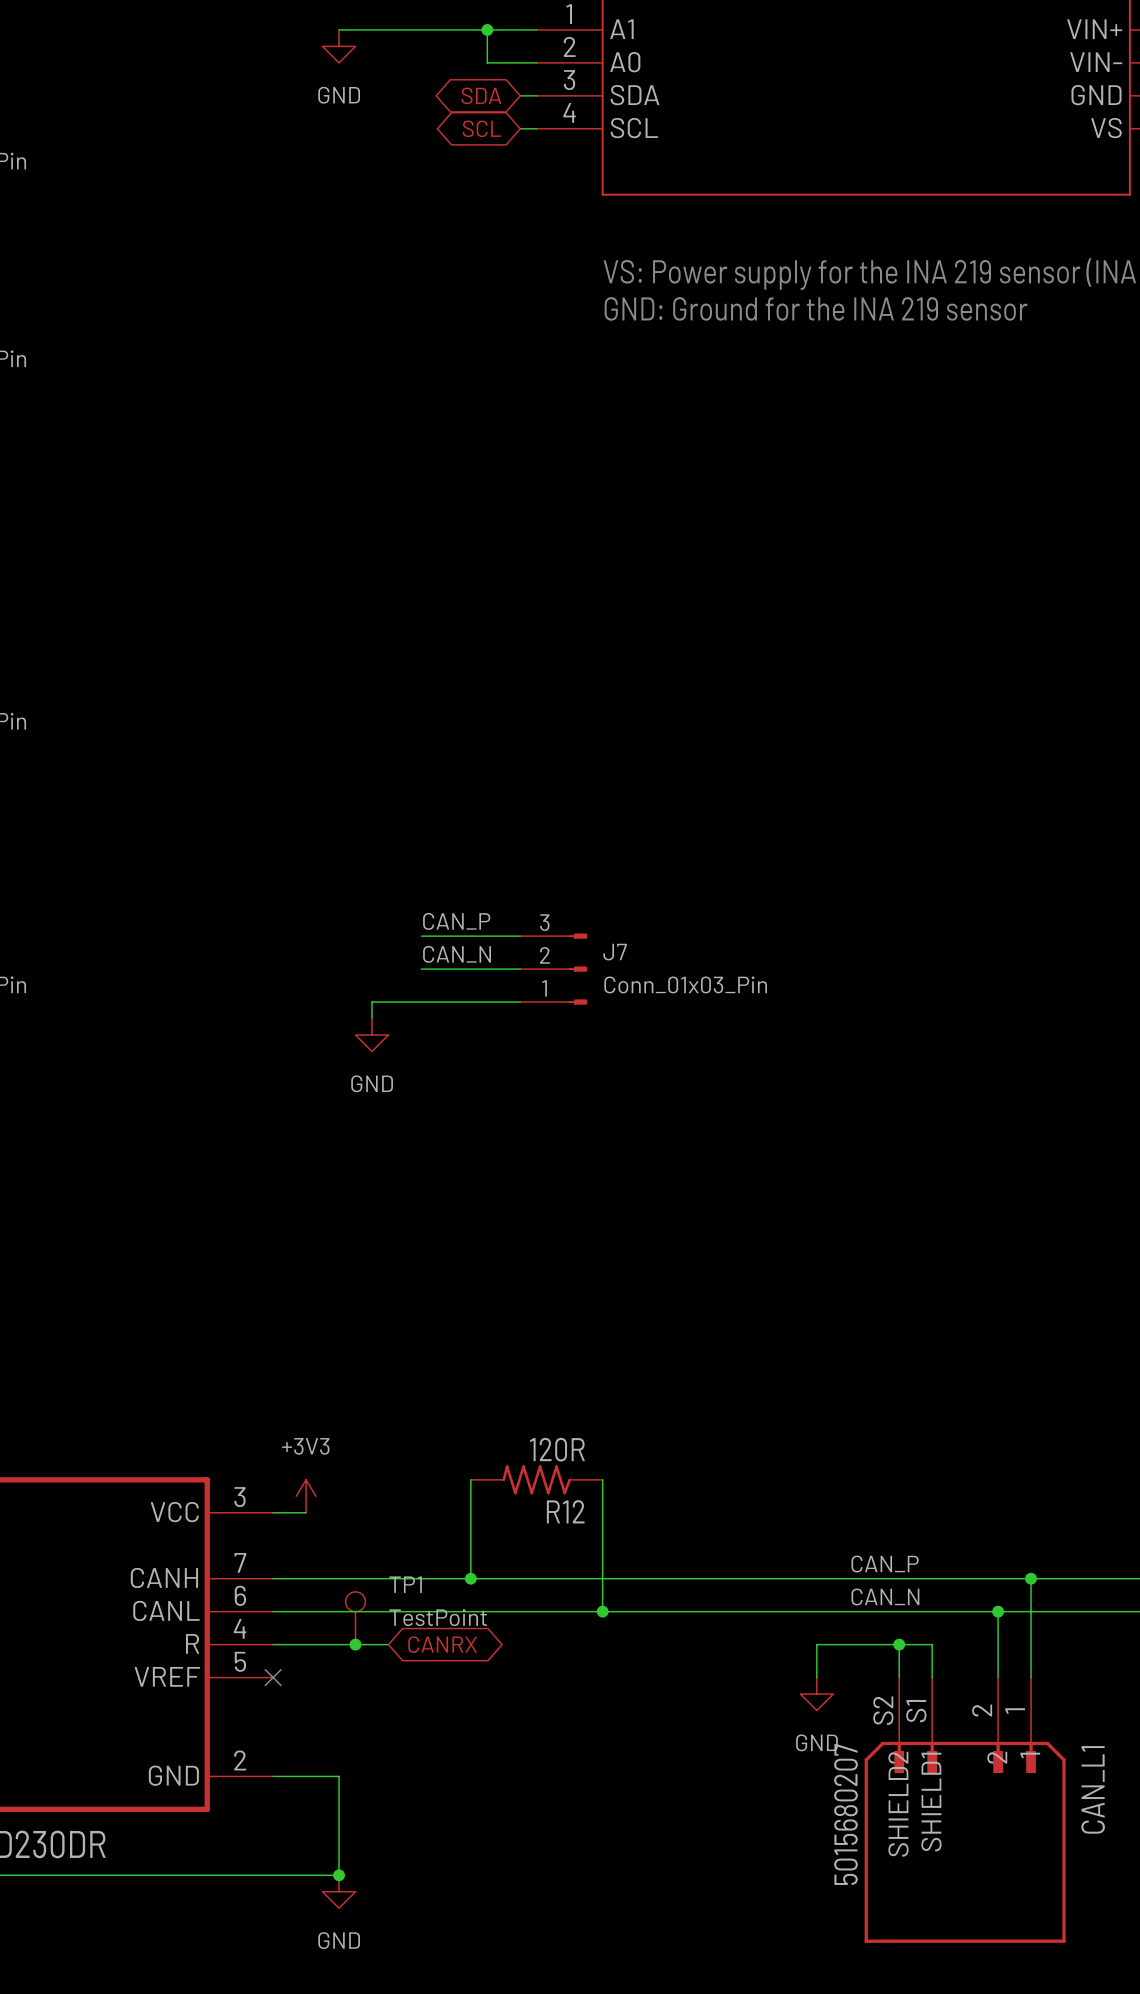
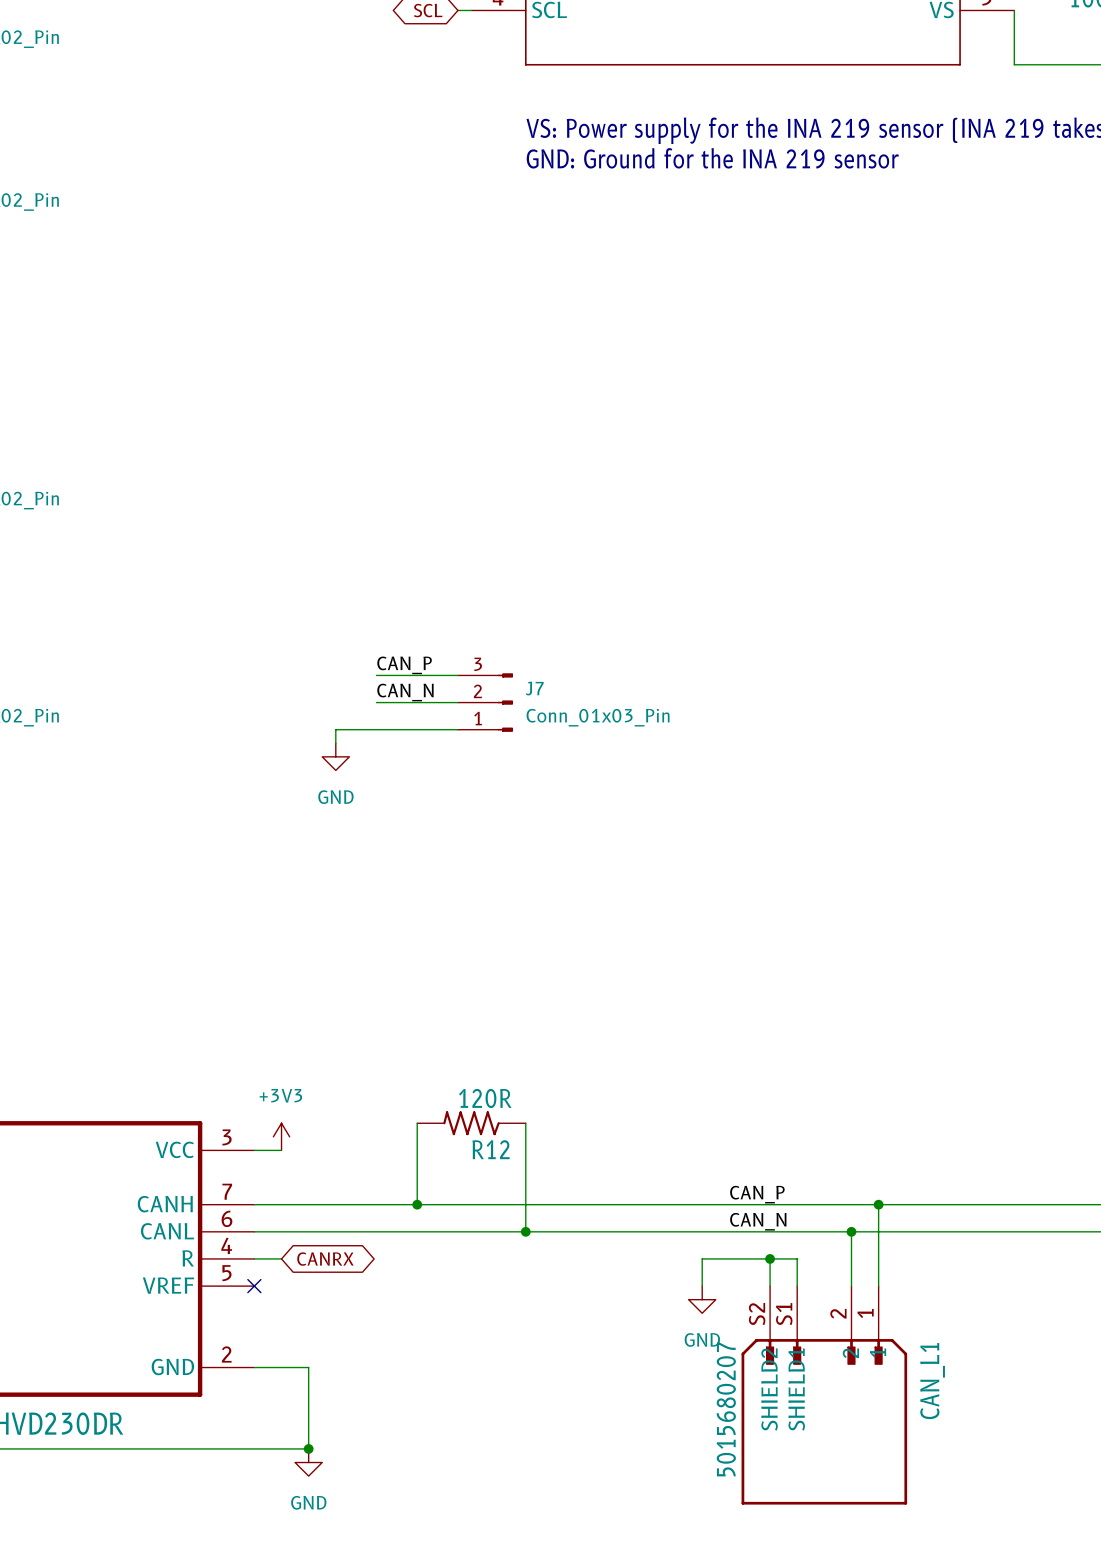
TP1: TestPoint (355, 1618) -> none
wire: (306, 1644) (388, 1644) -> none
junction: (355, 1644) -> none
global label position: CANRX (442, 1644) -> CANRX (325, 1259)

